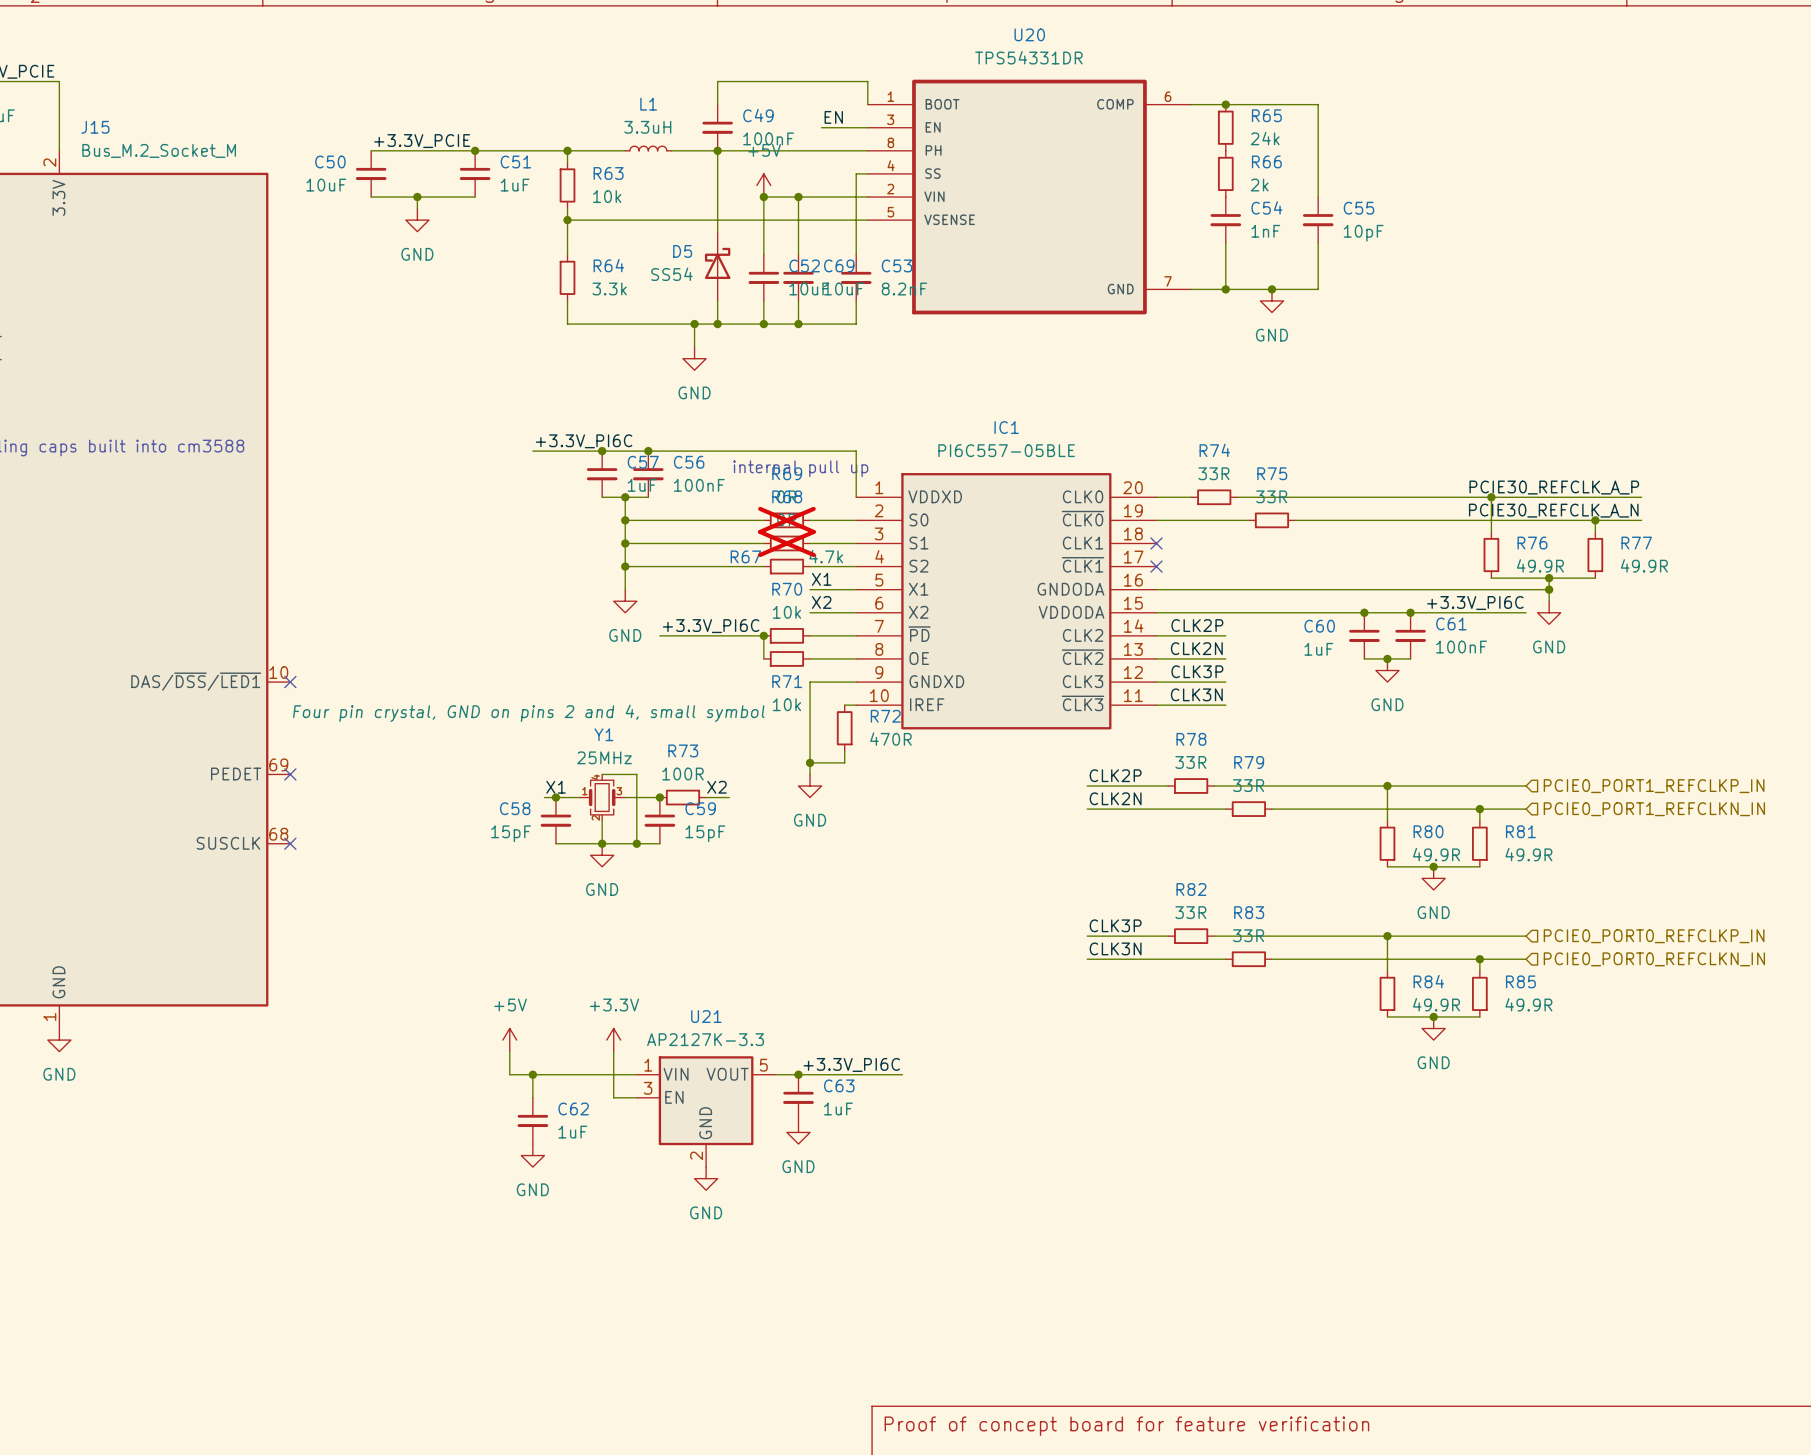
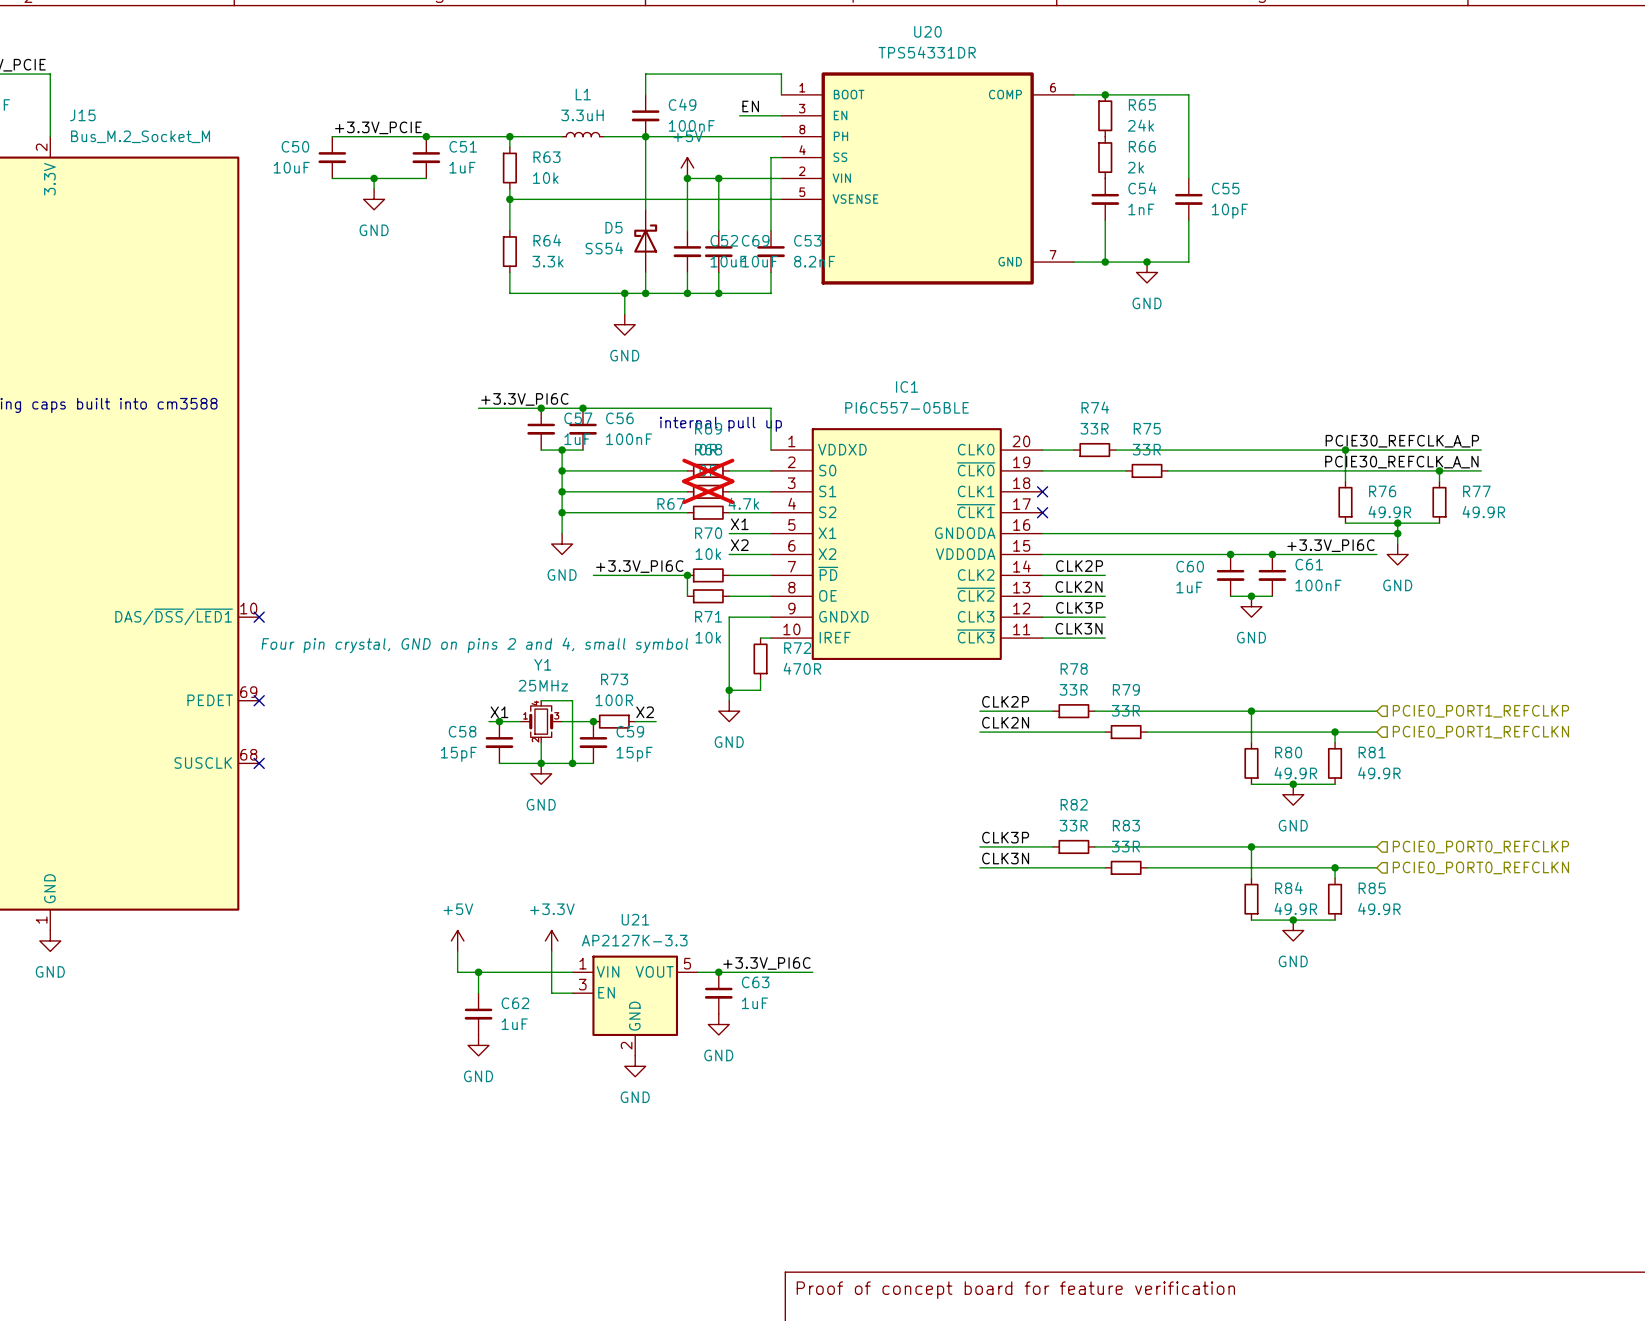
hierarchical label: PCIE0_PORT1_REFCLKP_IN (1654, 786) -> PCIE0_PORT1_REFCLKP (1480, 711)
hierarchical label: PCIE0_PORT1_REFCLKN_IN (1654, 809) -> PCIE0_PORT1_REFCLKN (1480, 732)
hierarchical label: PCIE0_PORT0_REFCLKP_IN (1654, 936) -> PCIE0_PORT0_REFCLKP (1480, 847)
hierarchical label: PCIE0_PORT0_REFCLKN_IN (1654, 959) -> PCIE0_PORT0_REFCLKN (1480, 867)

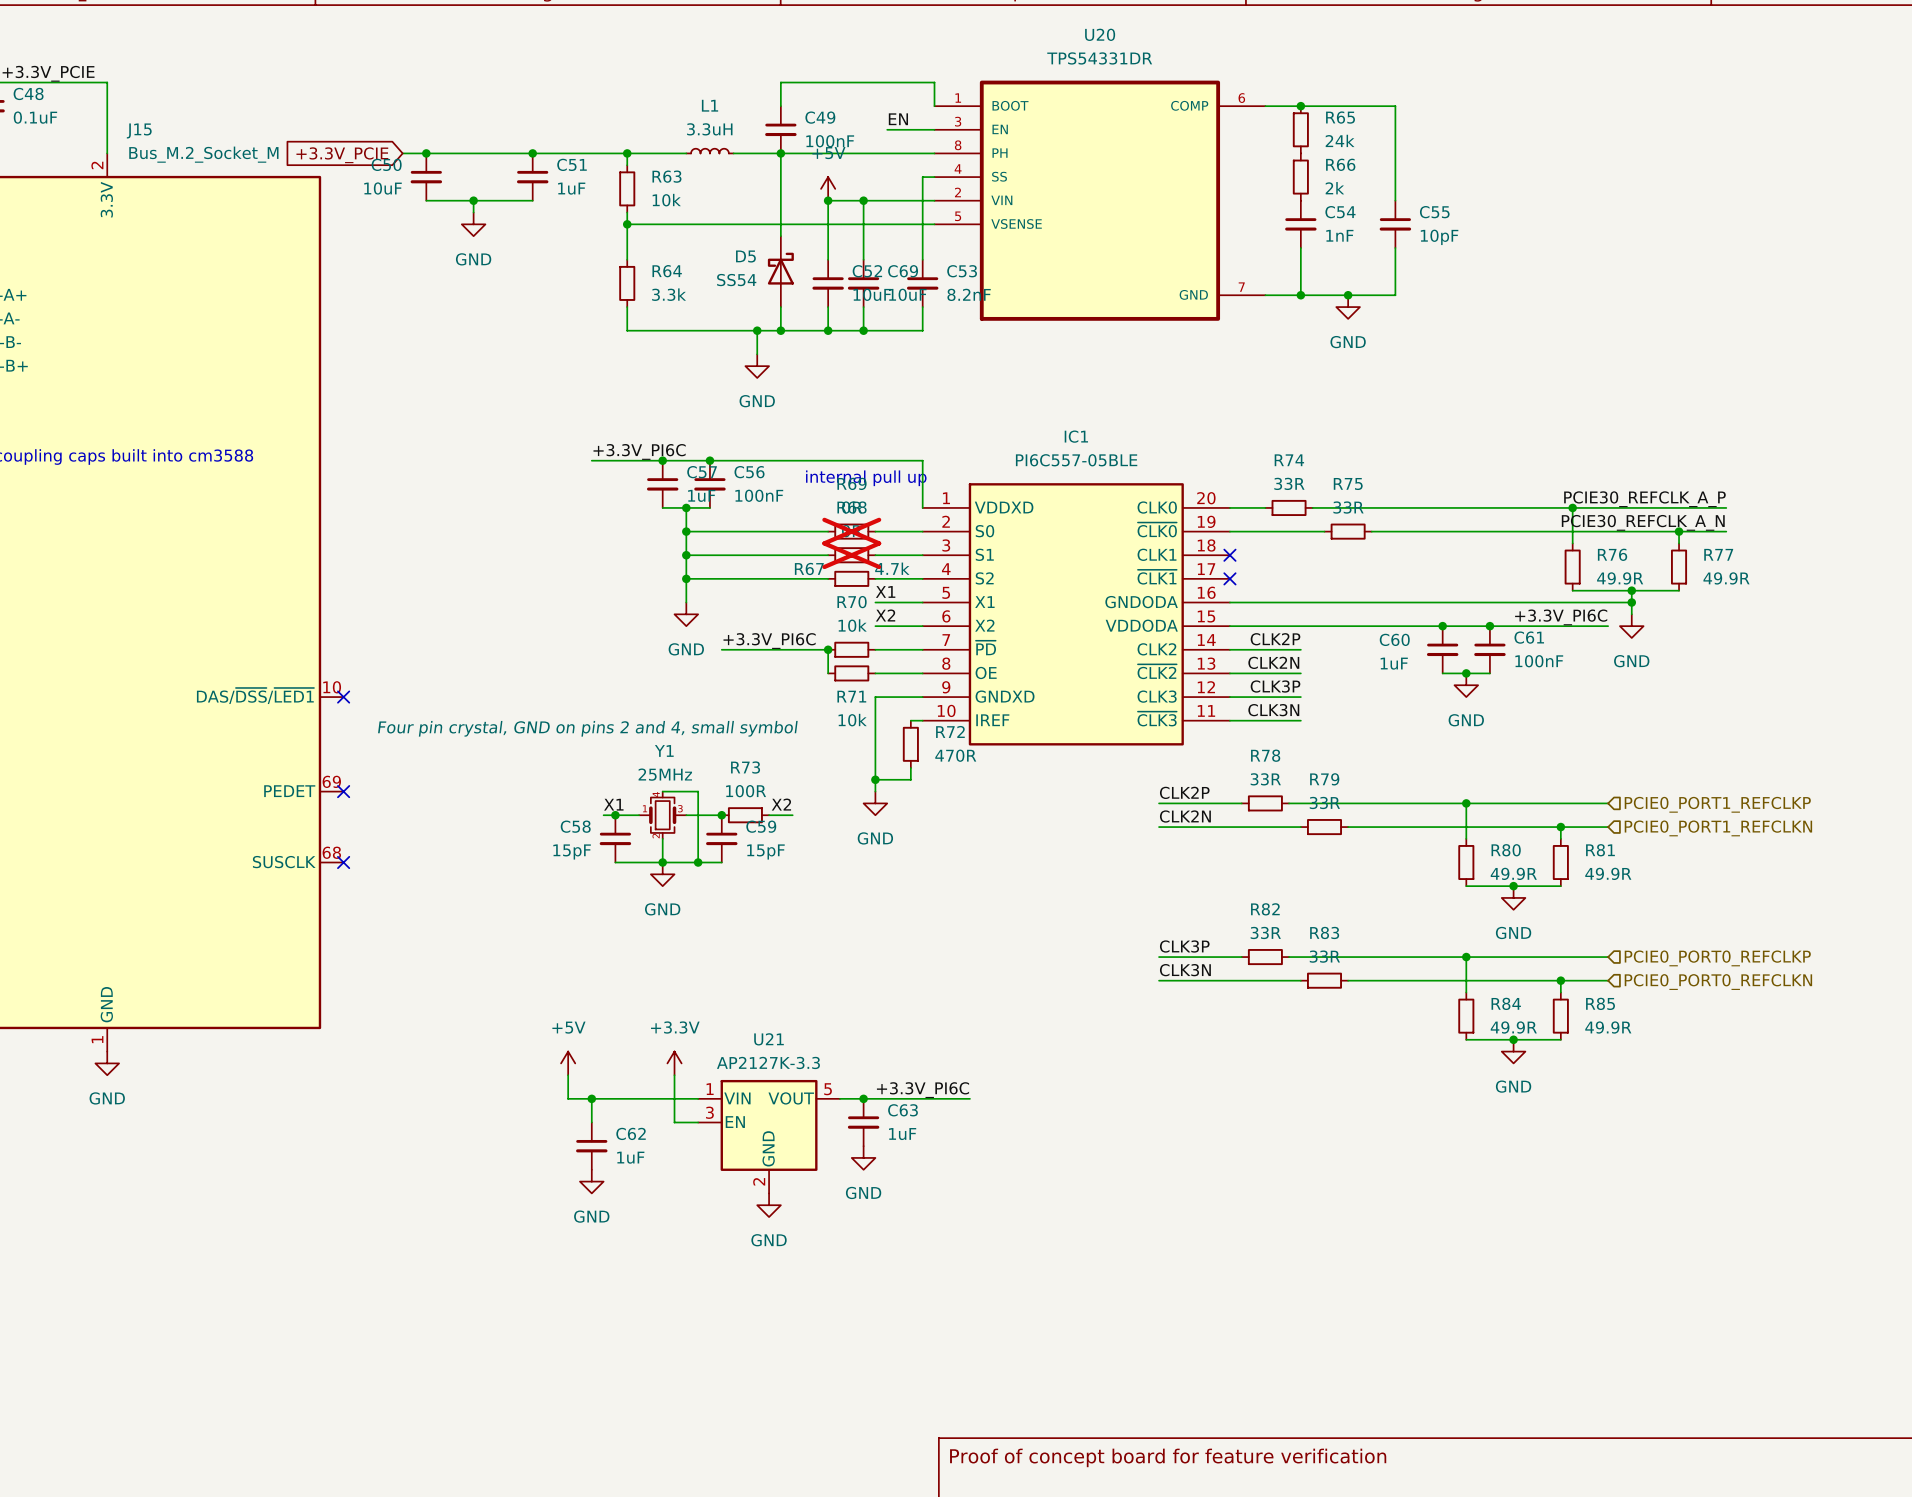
label: +3.3V_PCIE (378, 127) -> none
wire: none -> (402, 153) (426, 153)
junction: none -> (426, 153)
global label: none -> +3.3V_PCIE (342, 155)

